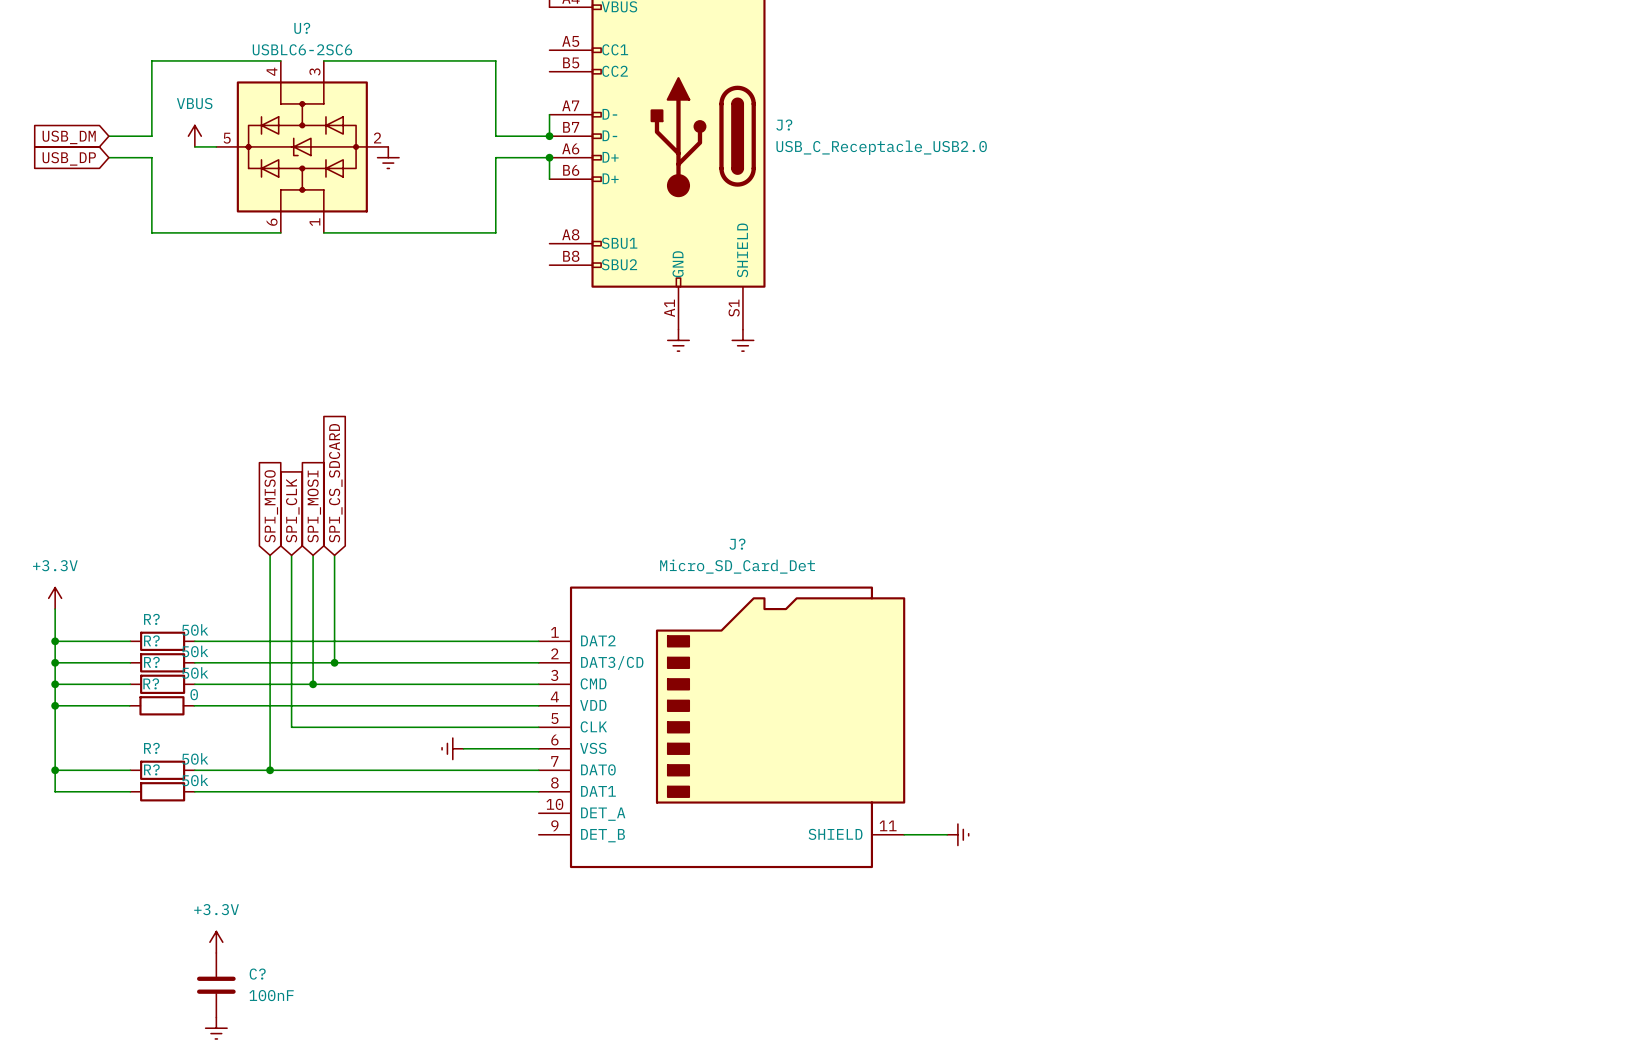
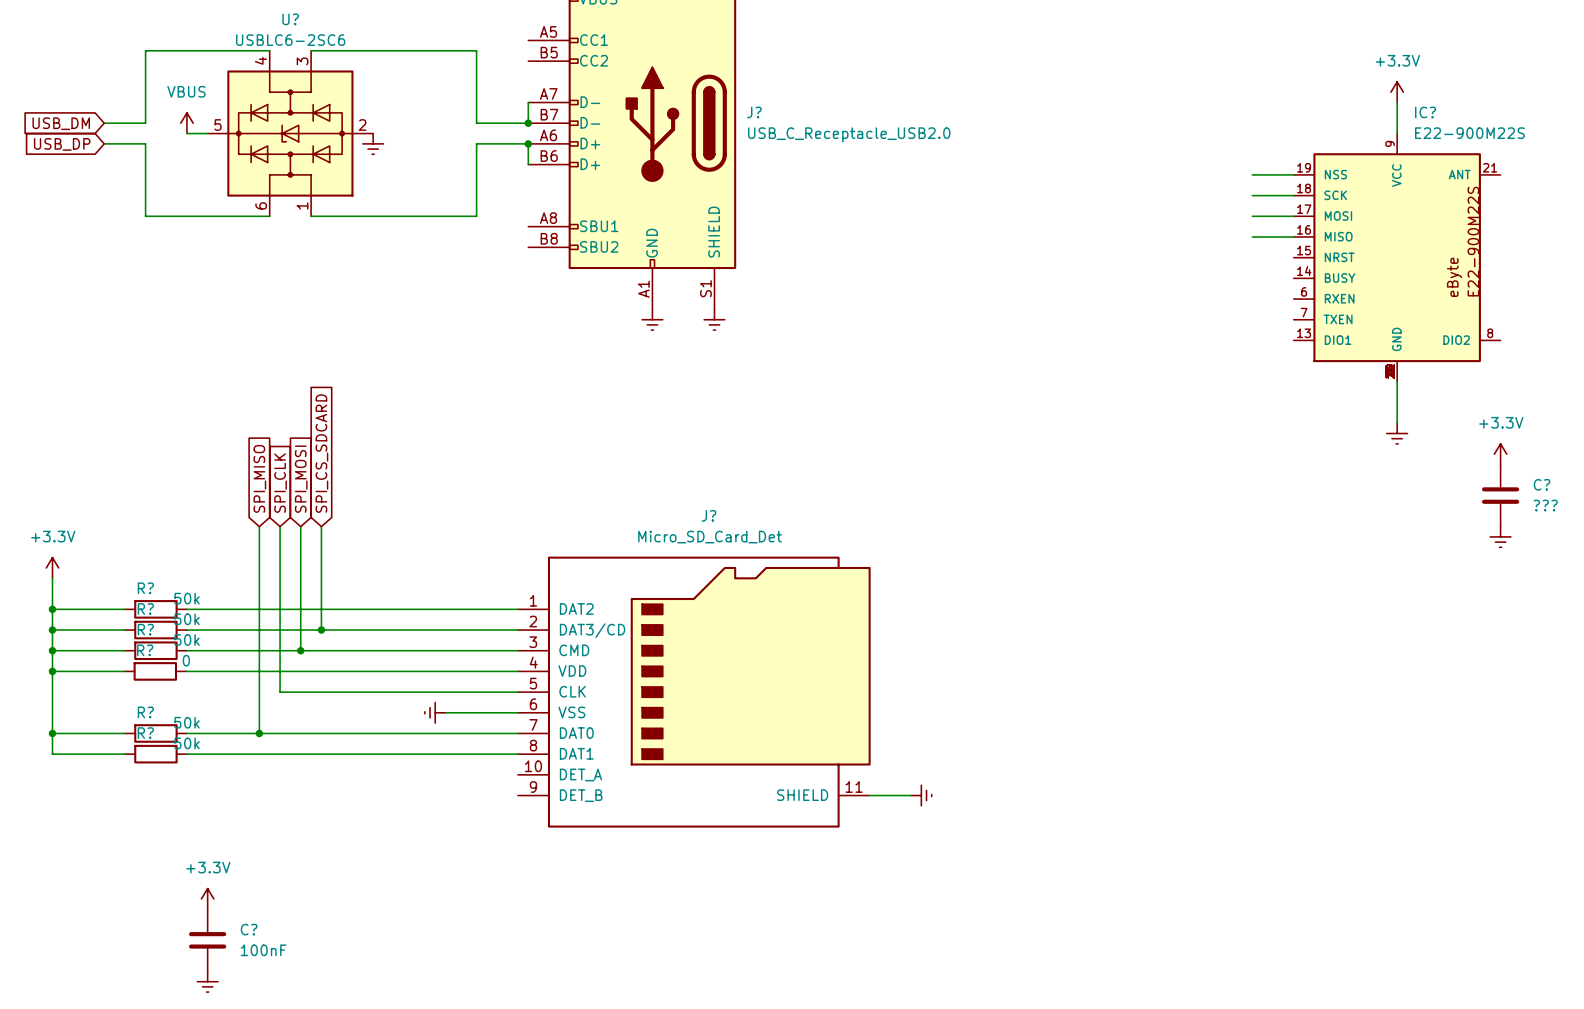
power symbol: none -> +3.3V (1397, 92)
wire: none -> (1397, 102) (1397, 133)
wire: none -> (1252, 174) (1293, 174)
wire: none -> (1252, 195) (1293, 195)
wire: none -> (1252, 216) (1293, 216)
wire: none -> (1252, 236) (1293, 236)
IC?: none -> E22-900M22S (1397, 257)
wire: none -> (1397, 381) (1397, 423)
power symbol: none -> (1397, 433)
power symbol: none -> +3.3V (1500, 454)
C?: none -> ??? (1500, 495)
power symbol: none -> (1500, 536)

